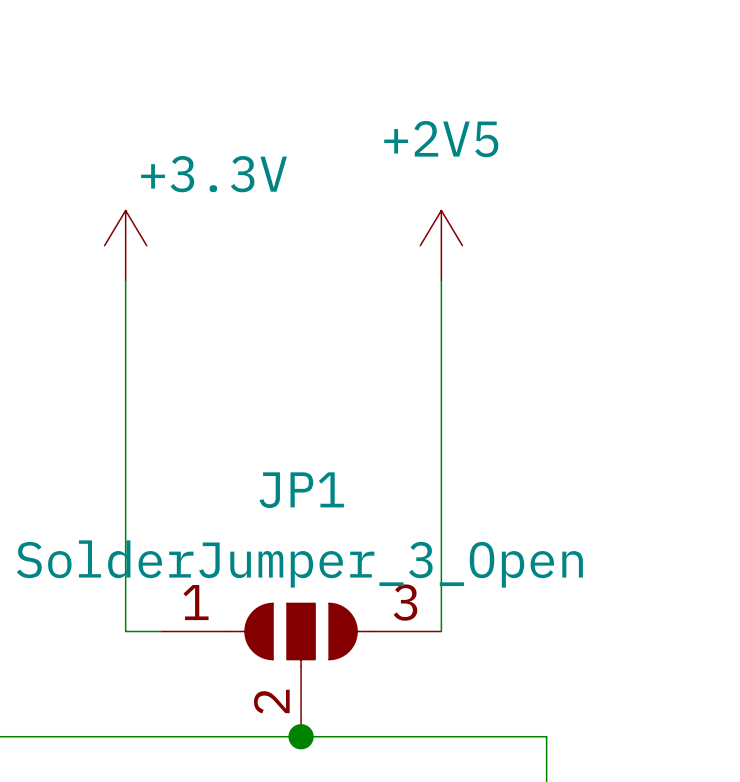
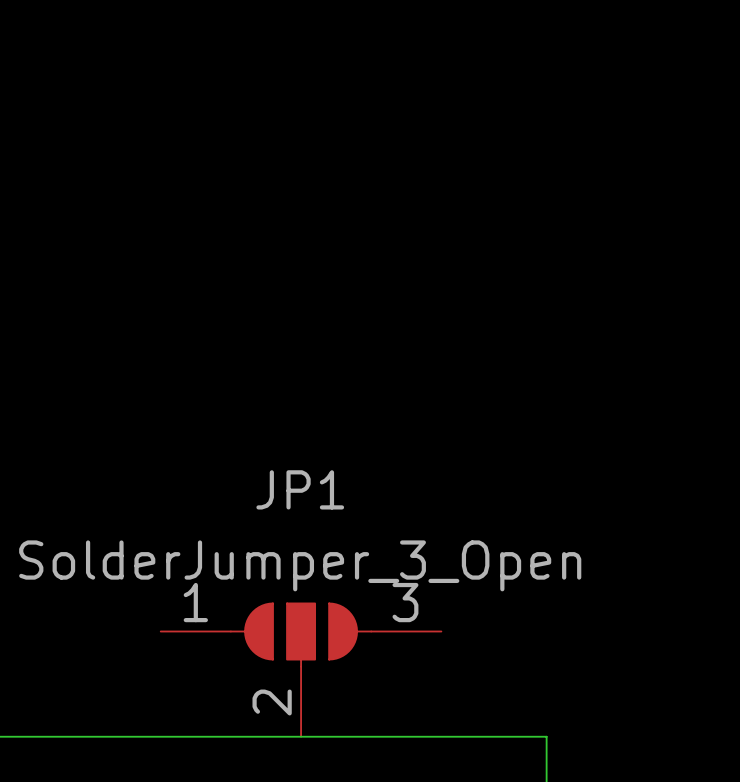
power symbol: +3.3V (125, 245) -> none
power symbol: +2V5 (441, 245) -> none
wire: (125, 280) (125, 631) (160, 631) -> none
wire: (441, 280) (441, 631) -> none
junction: (301, 736) -> none

